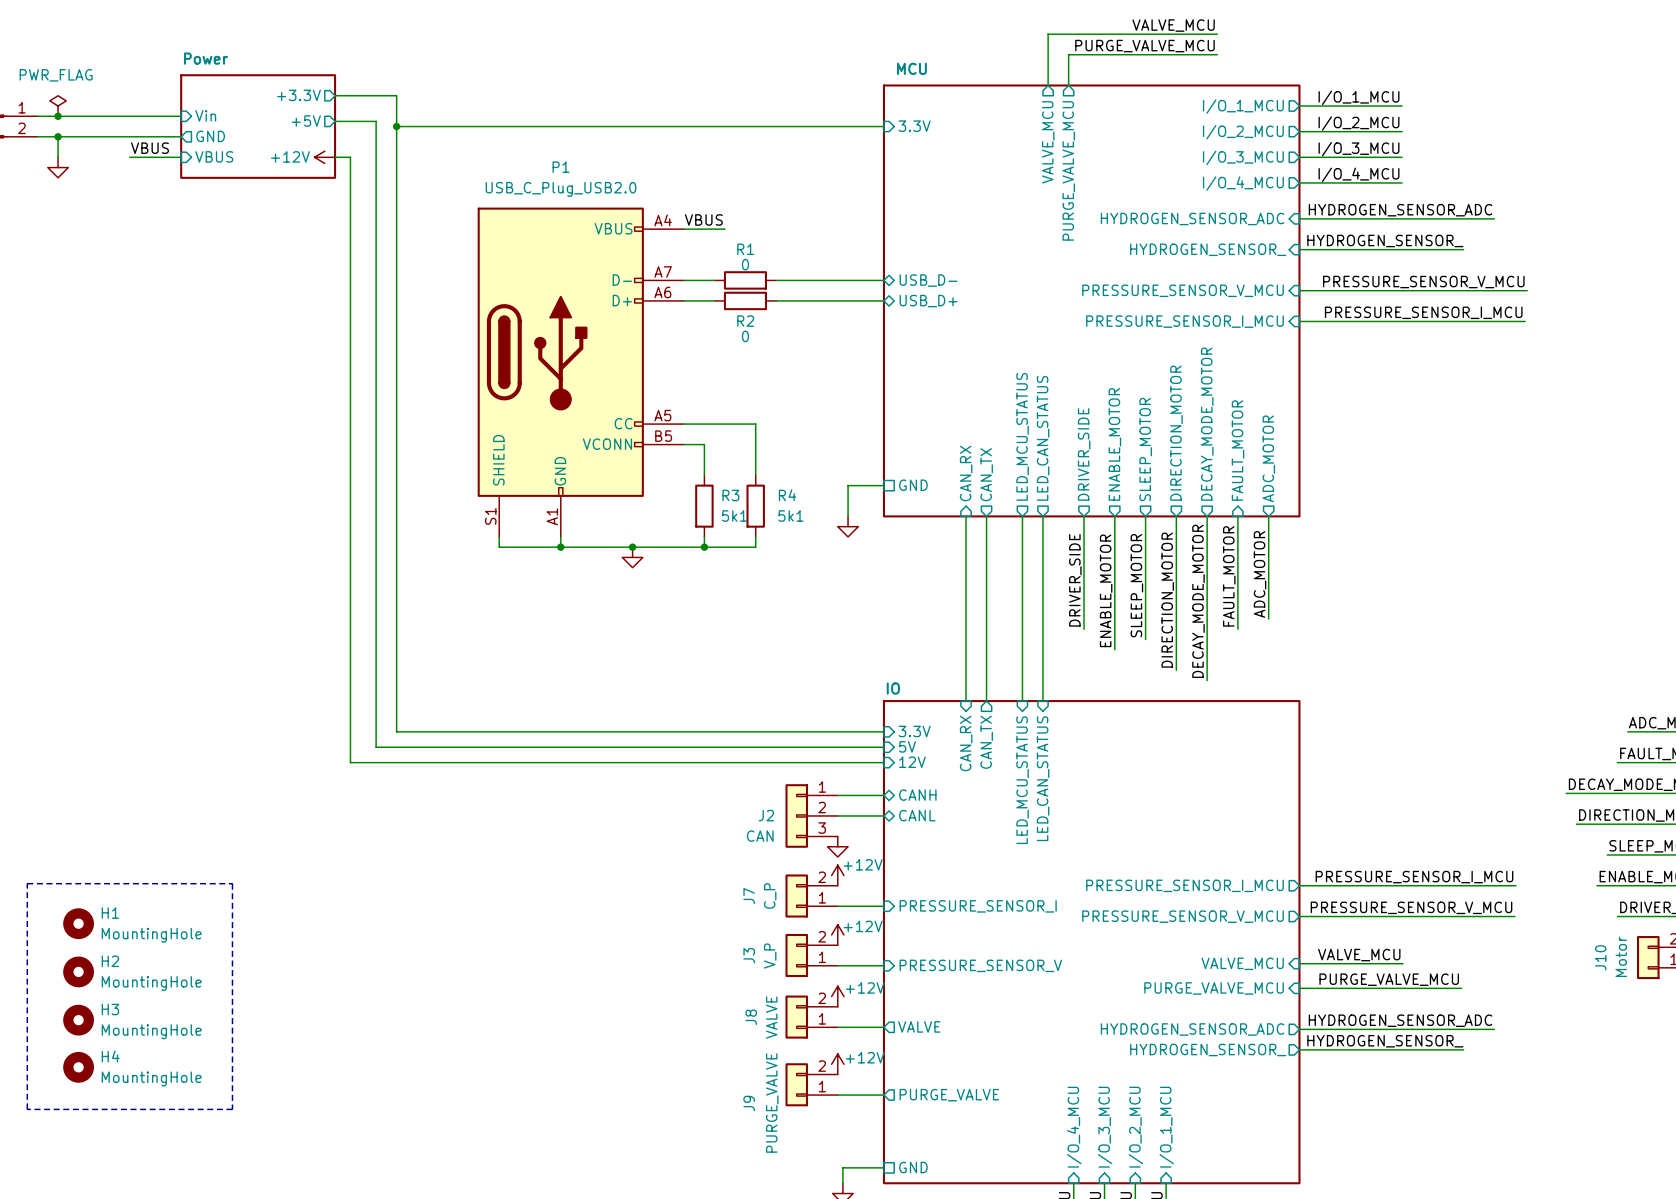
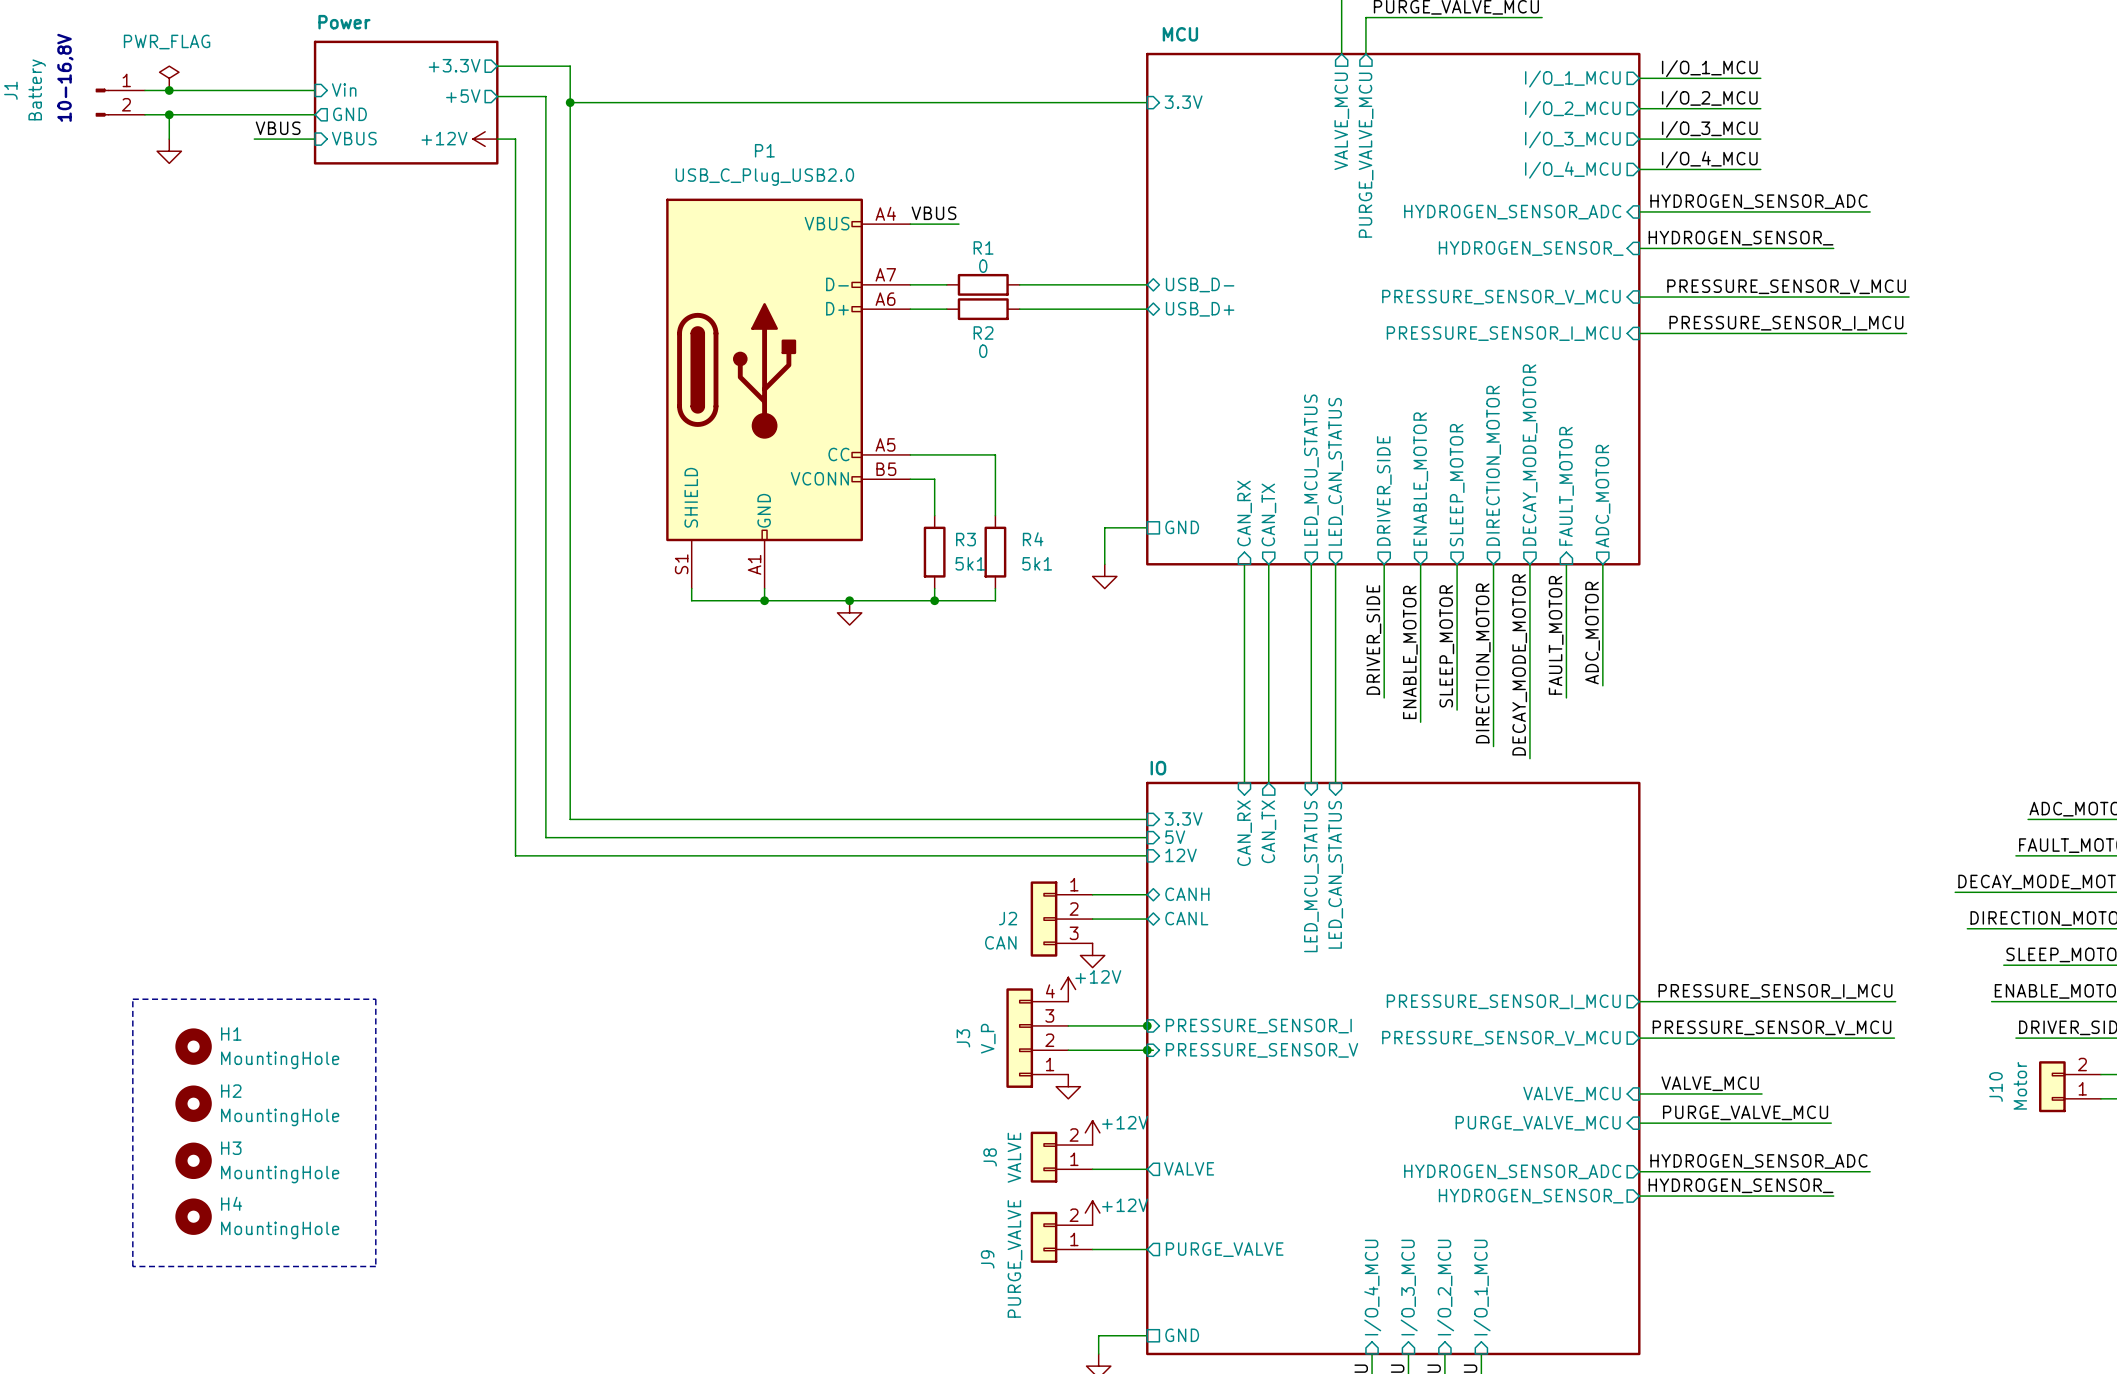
power symbol position: +12V (837, 875) -> +12V (1068, 989)
J7: C_P (811, 896) -> none
junction: none -> (1147, 1025)
wire: none -> (1068, 1050) (1153, 1050)
junction: none -> (1147, 1050)
J3 symbol: [785, 933, 838, 978] -> [1006, 988, 1069, 1088]
power symbol: +12V (837, 934) -> none
power symbol: none -> (1068, 1086)
wire: (837, 965) (883, 965) -> none
sheet pin position: PRESSURE_SENSOR_V (980, 965) -> PRESSURE_SENSOR_V (1262, 1050)

